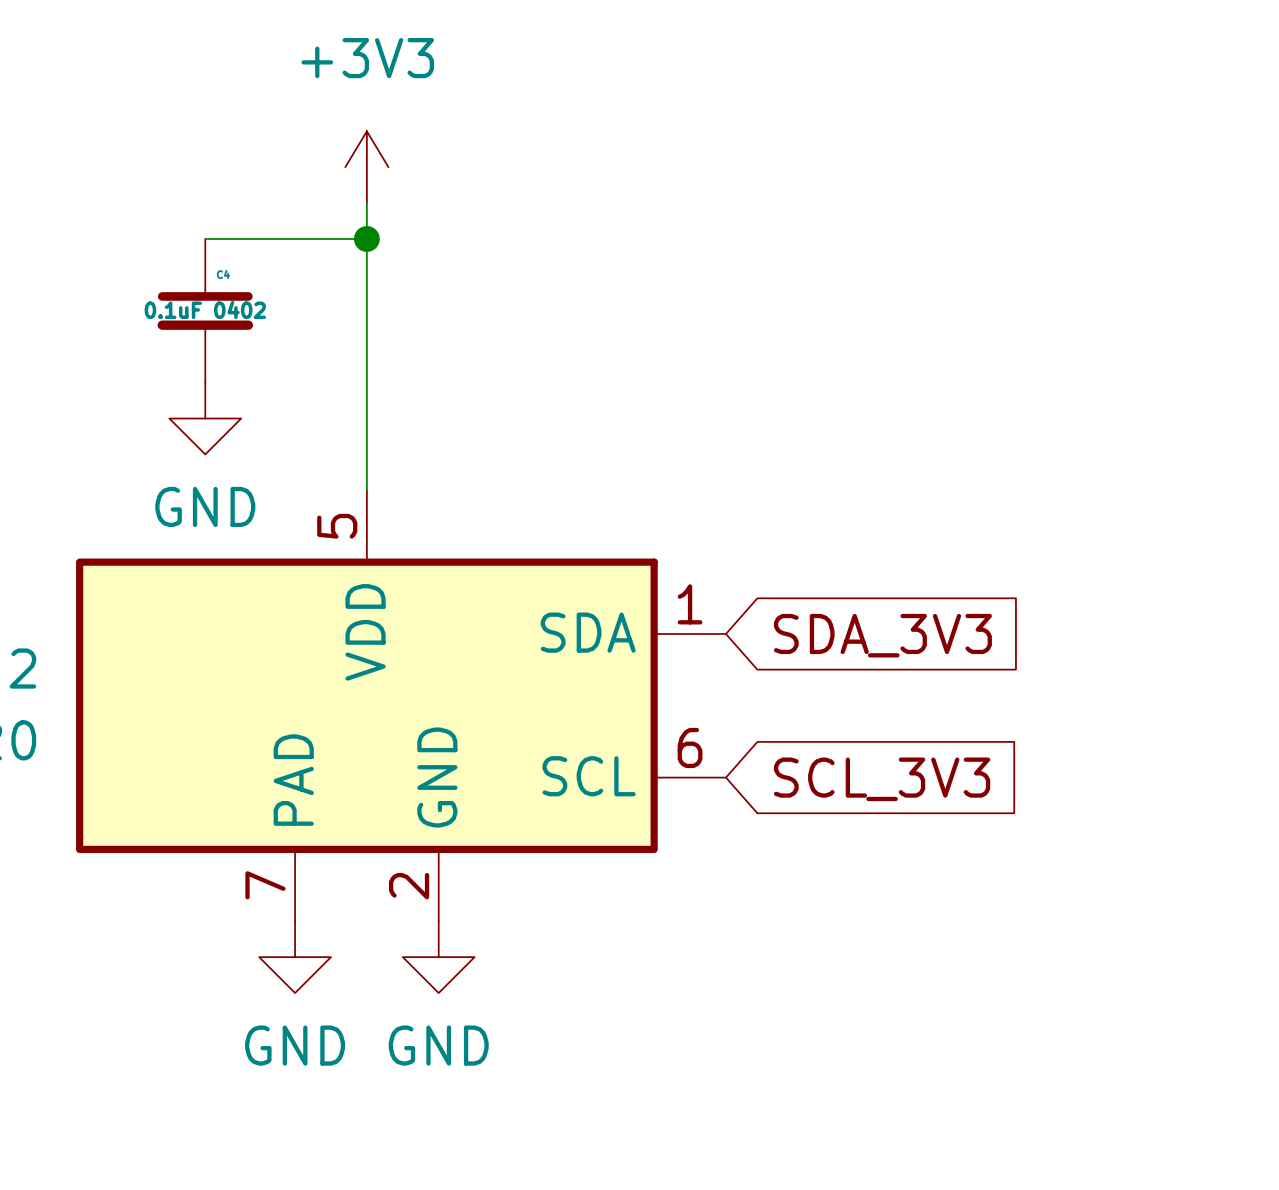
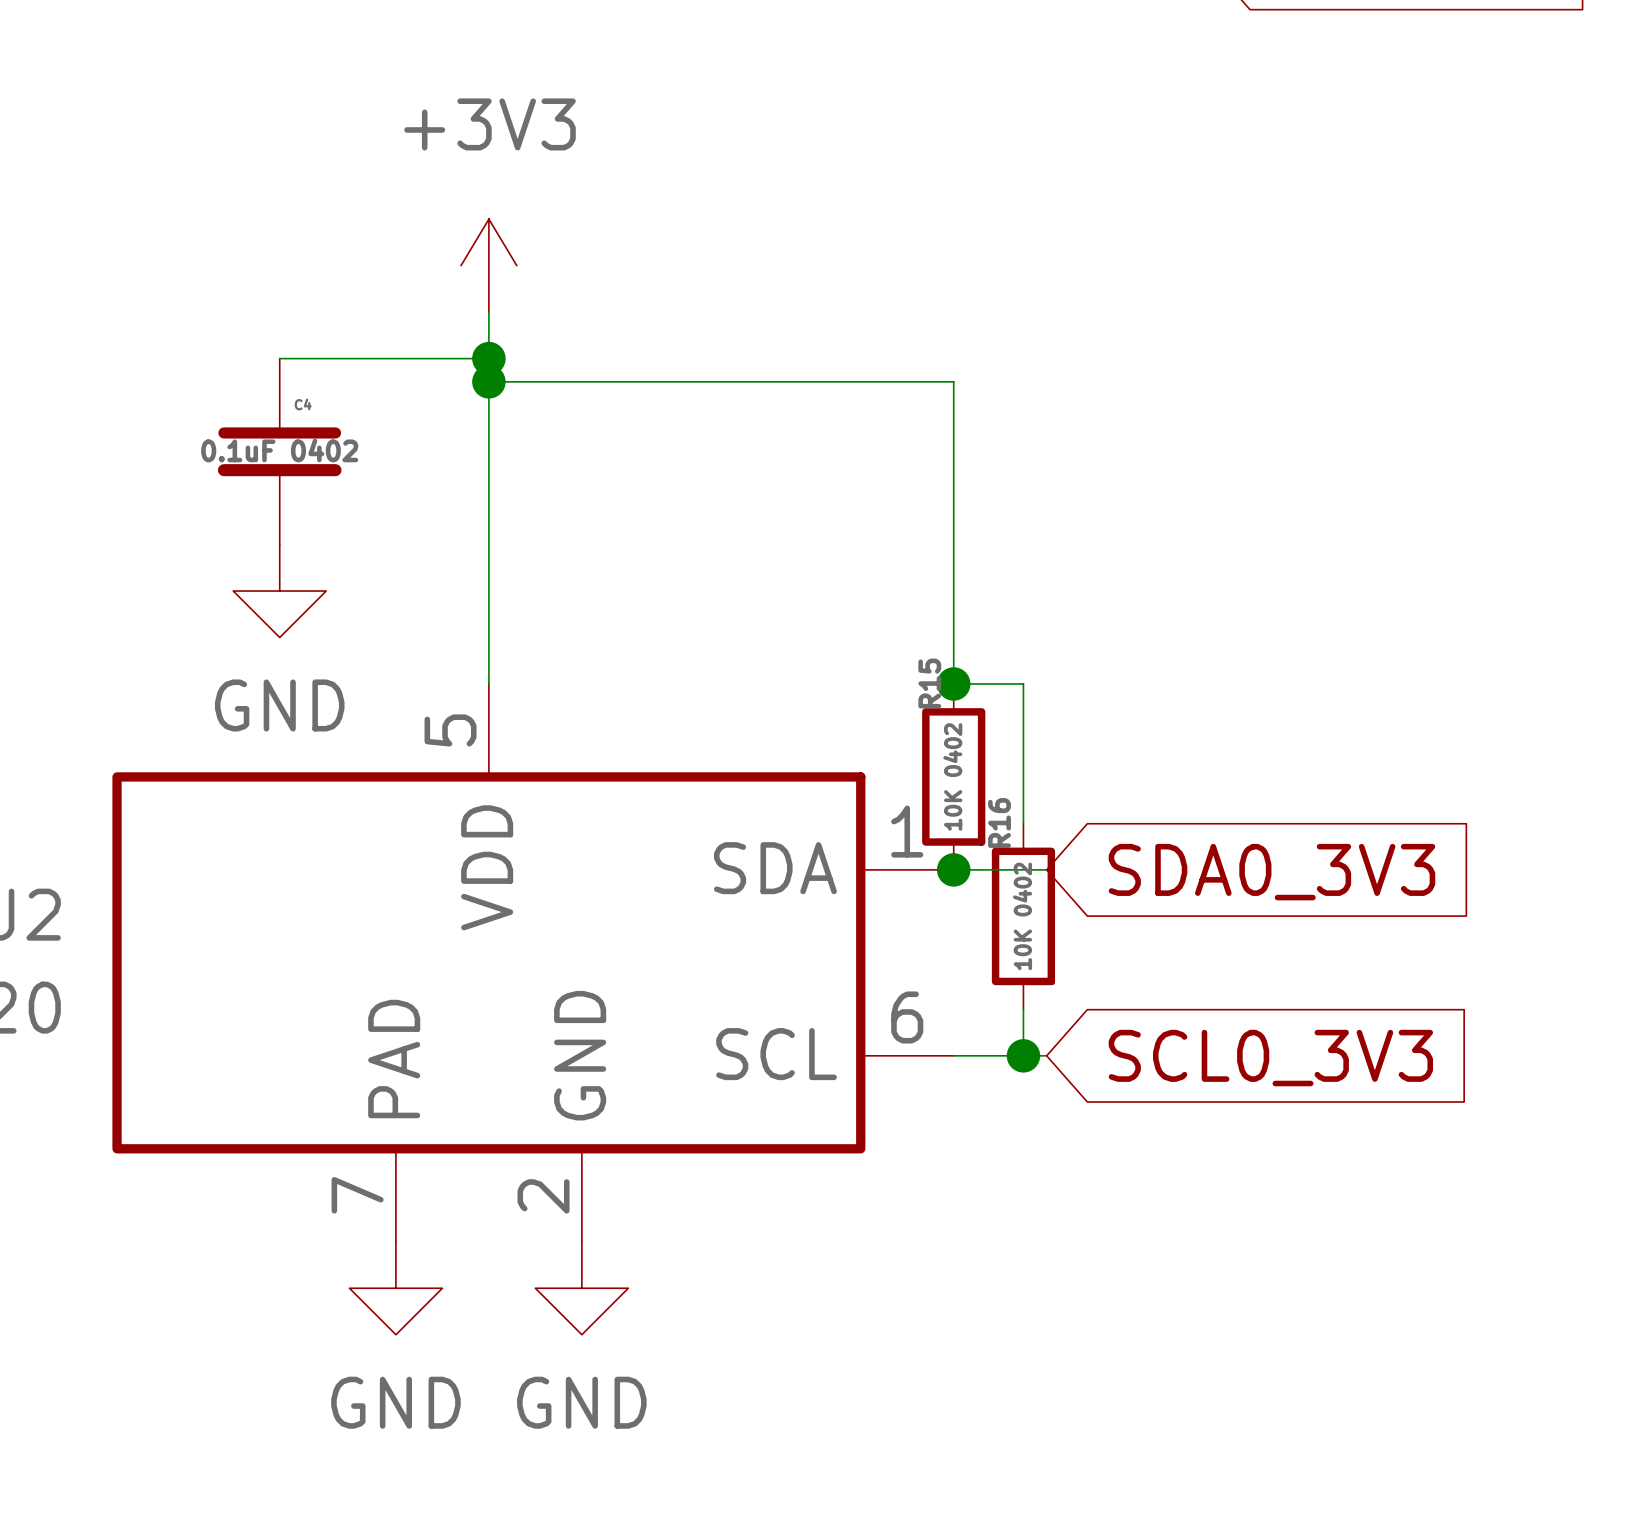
wire: none -> (488, 381) (953, 381) (953, 683) (1023, 683) (1023, 823)
junction: none -> (488, 381)
junction: none -> (953, 683)
R15: none -> 10K 0402 (953, 776)
wire: none -> (953, 869) (1046, 869)
junction: none -> (953, 869)
global label: SDA_3V3 (882, 635) -> SDA0_3V3 (1271, 872)
R16: none -> 10K 0402 (1023, 916)
wire: none -> (1023, 1009) (1023, 1055)
wire: none -> (953, 1055) (1046, 1055)
junction: none -> (1023, 1055)
global label: SCL_3V3 (882, 779) -> SCL0_3V3 (1270, 1058)

